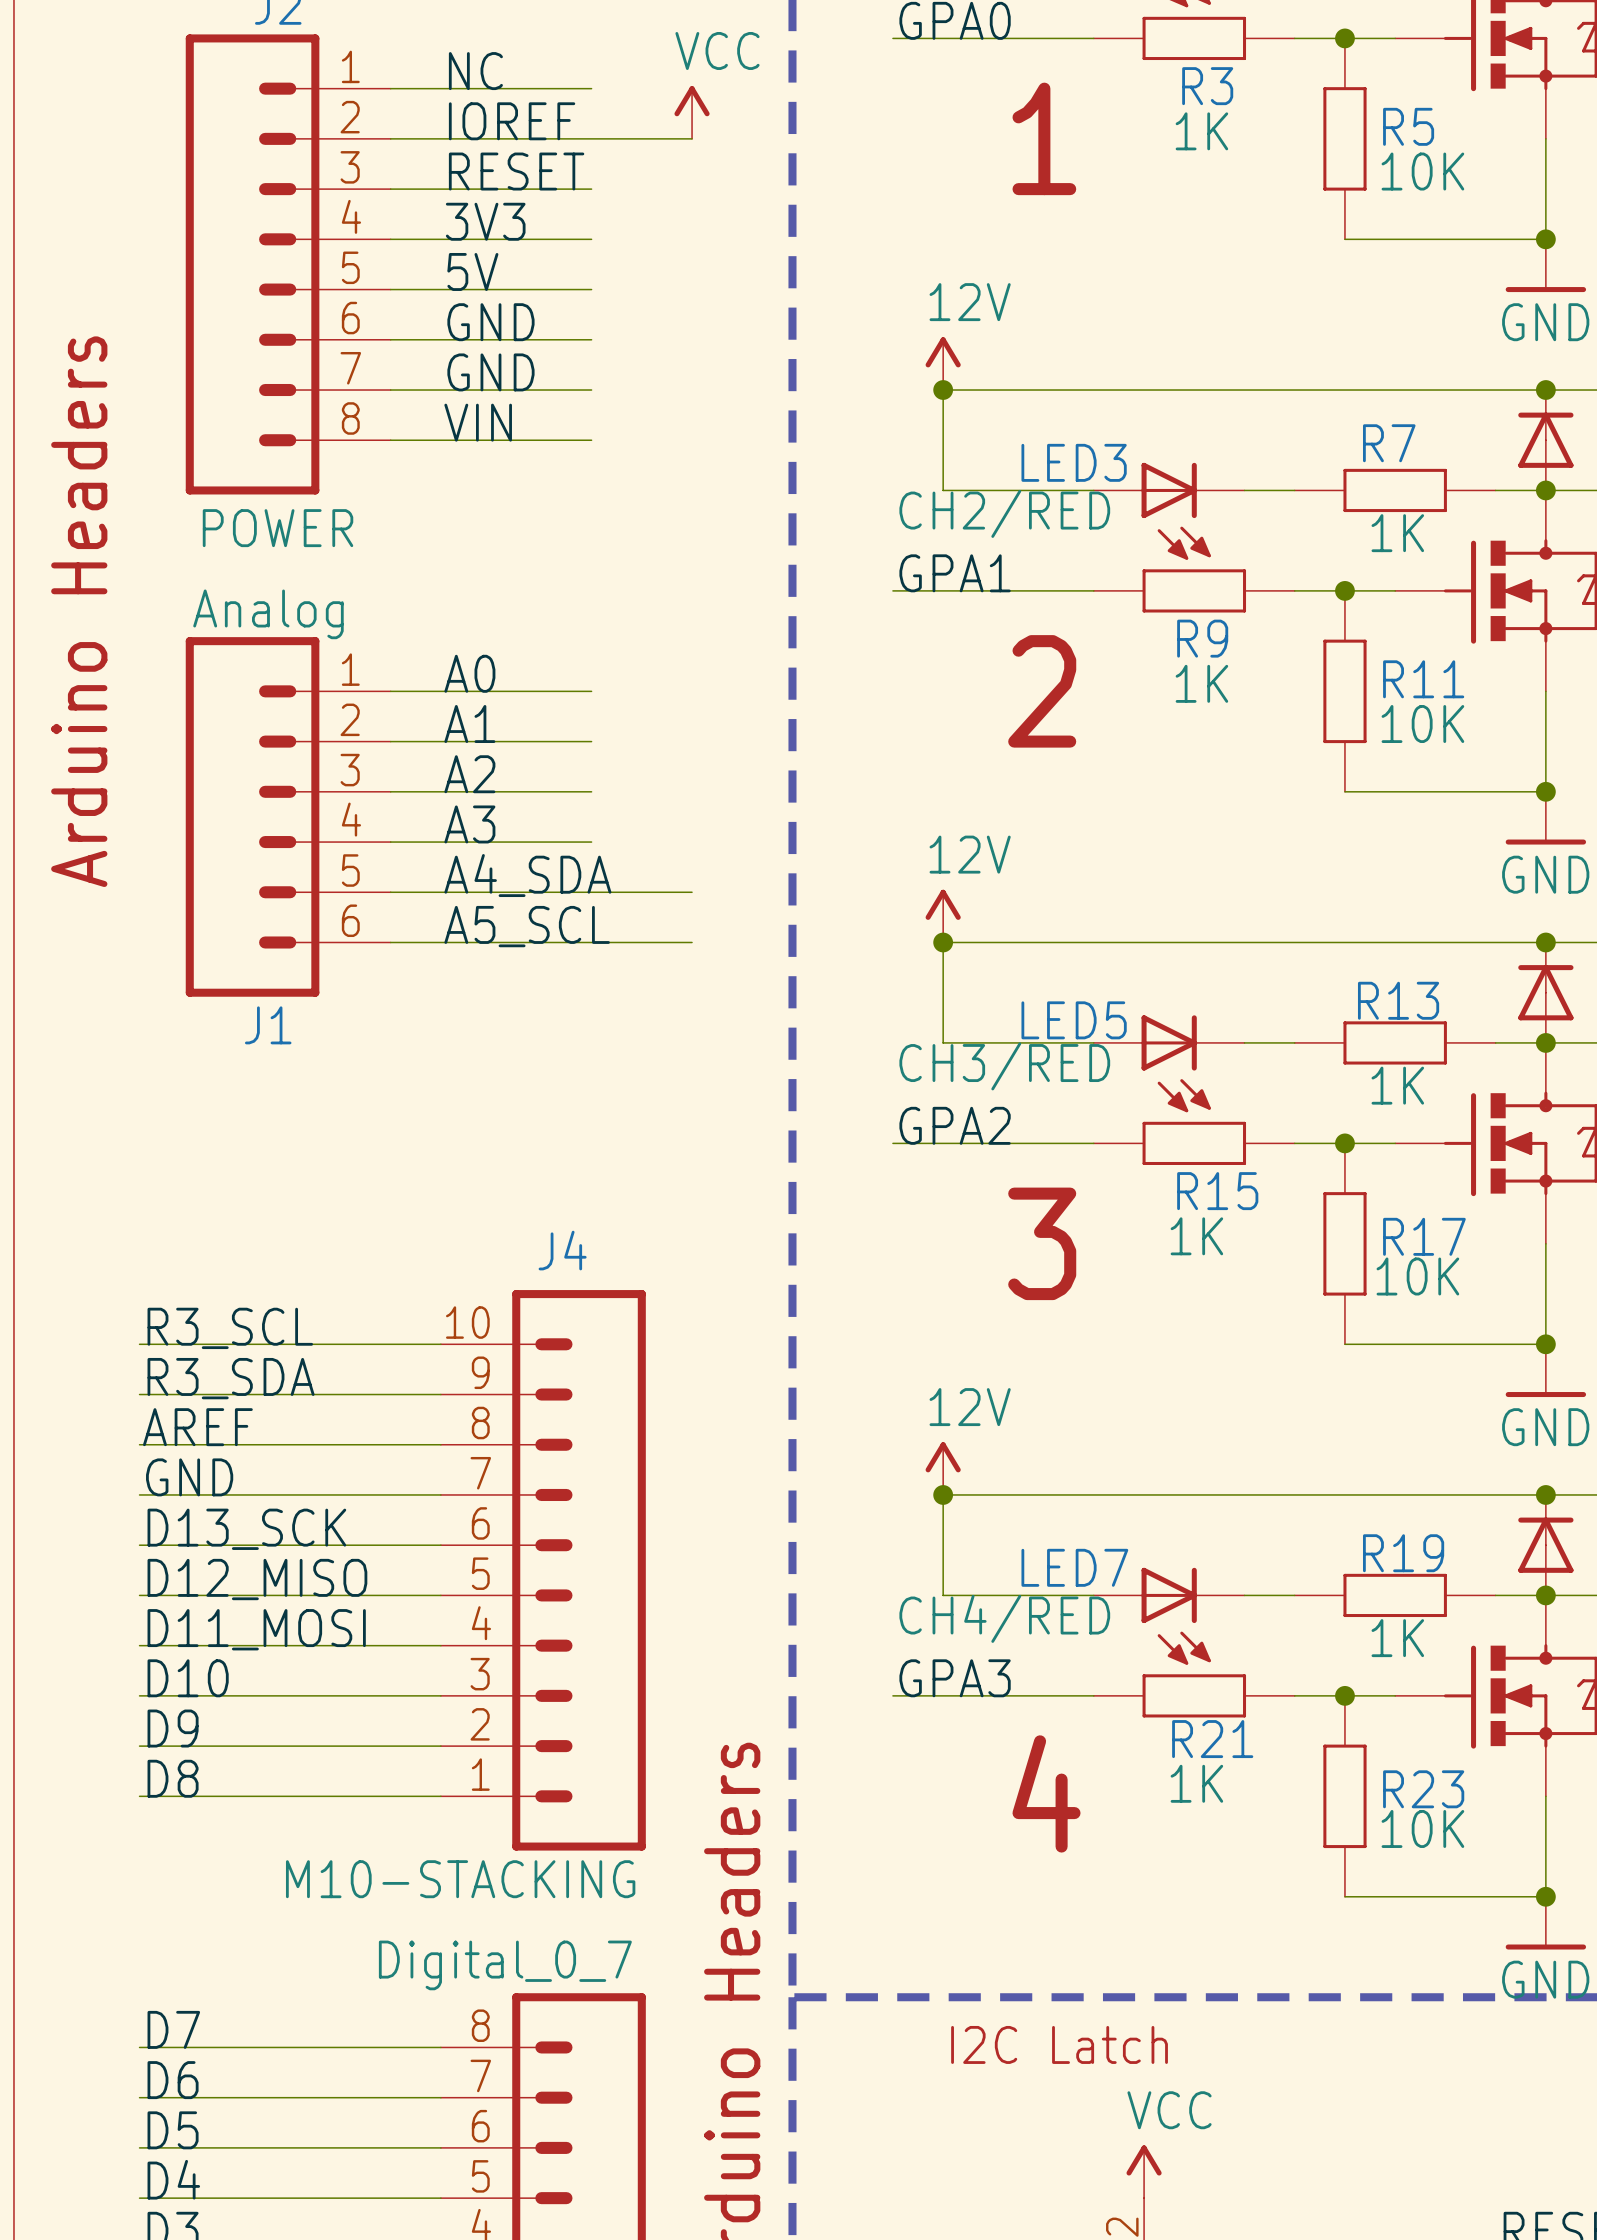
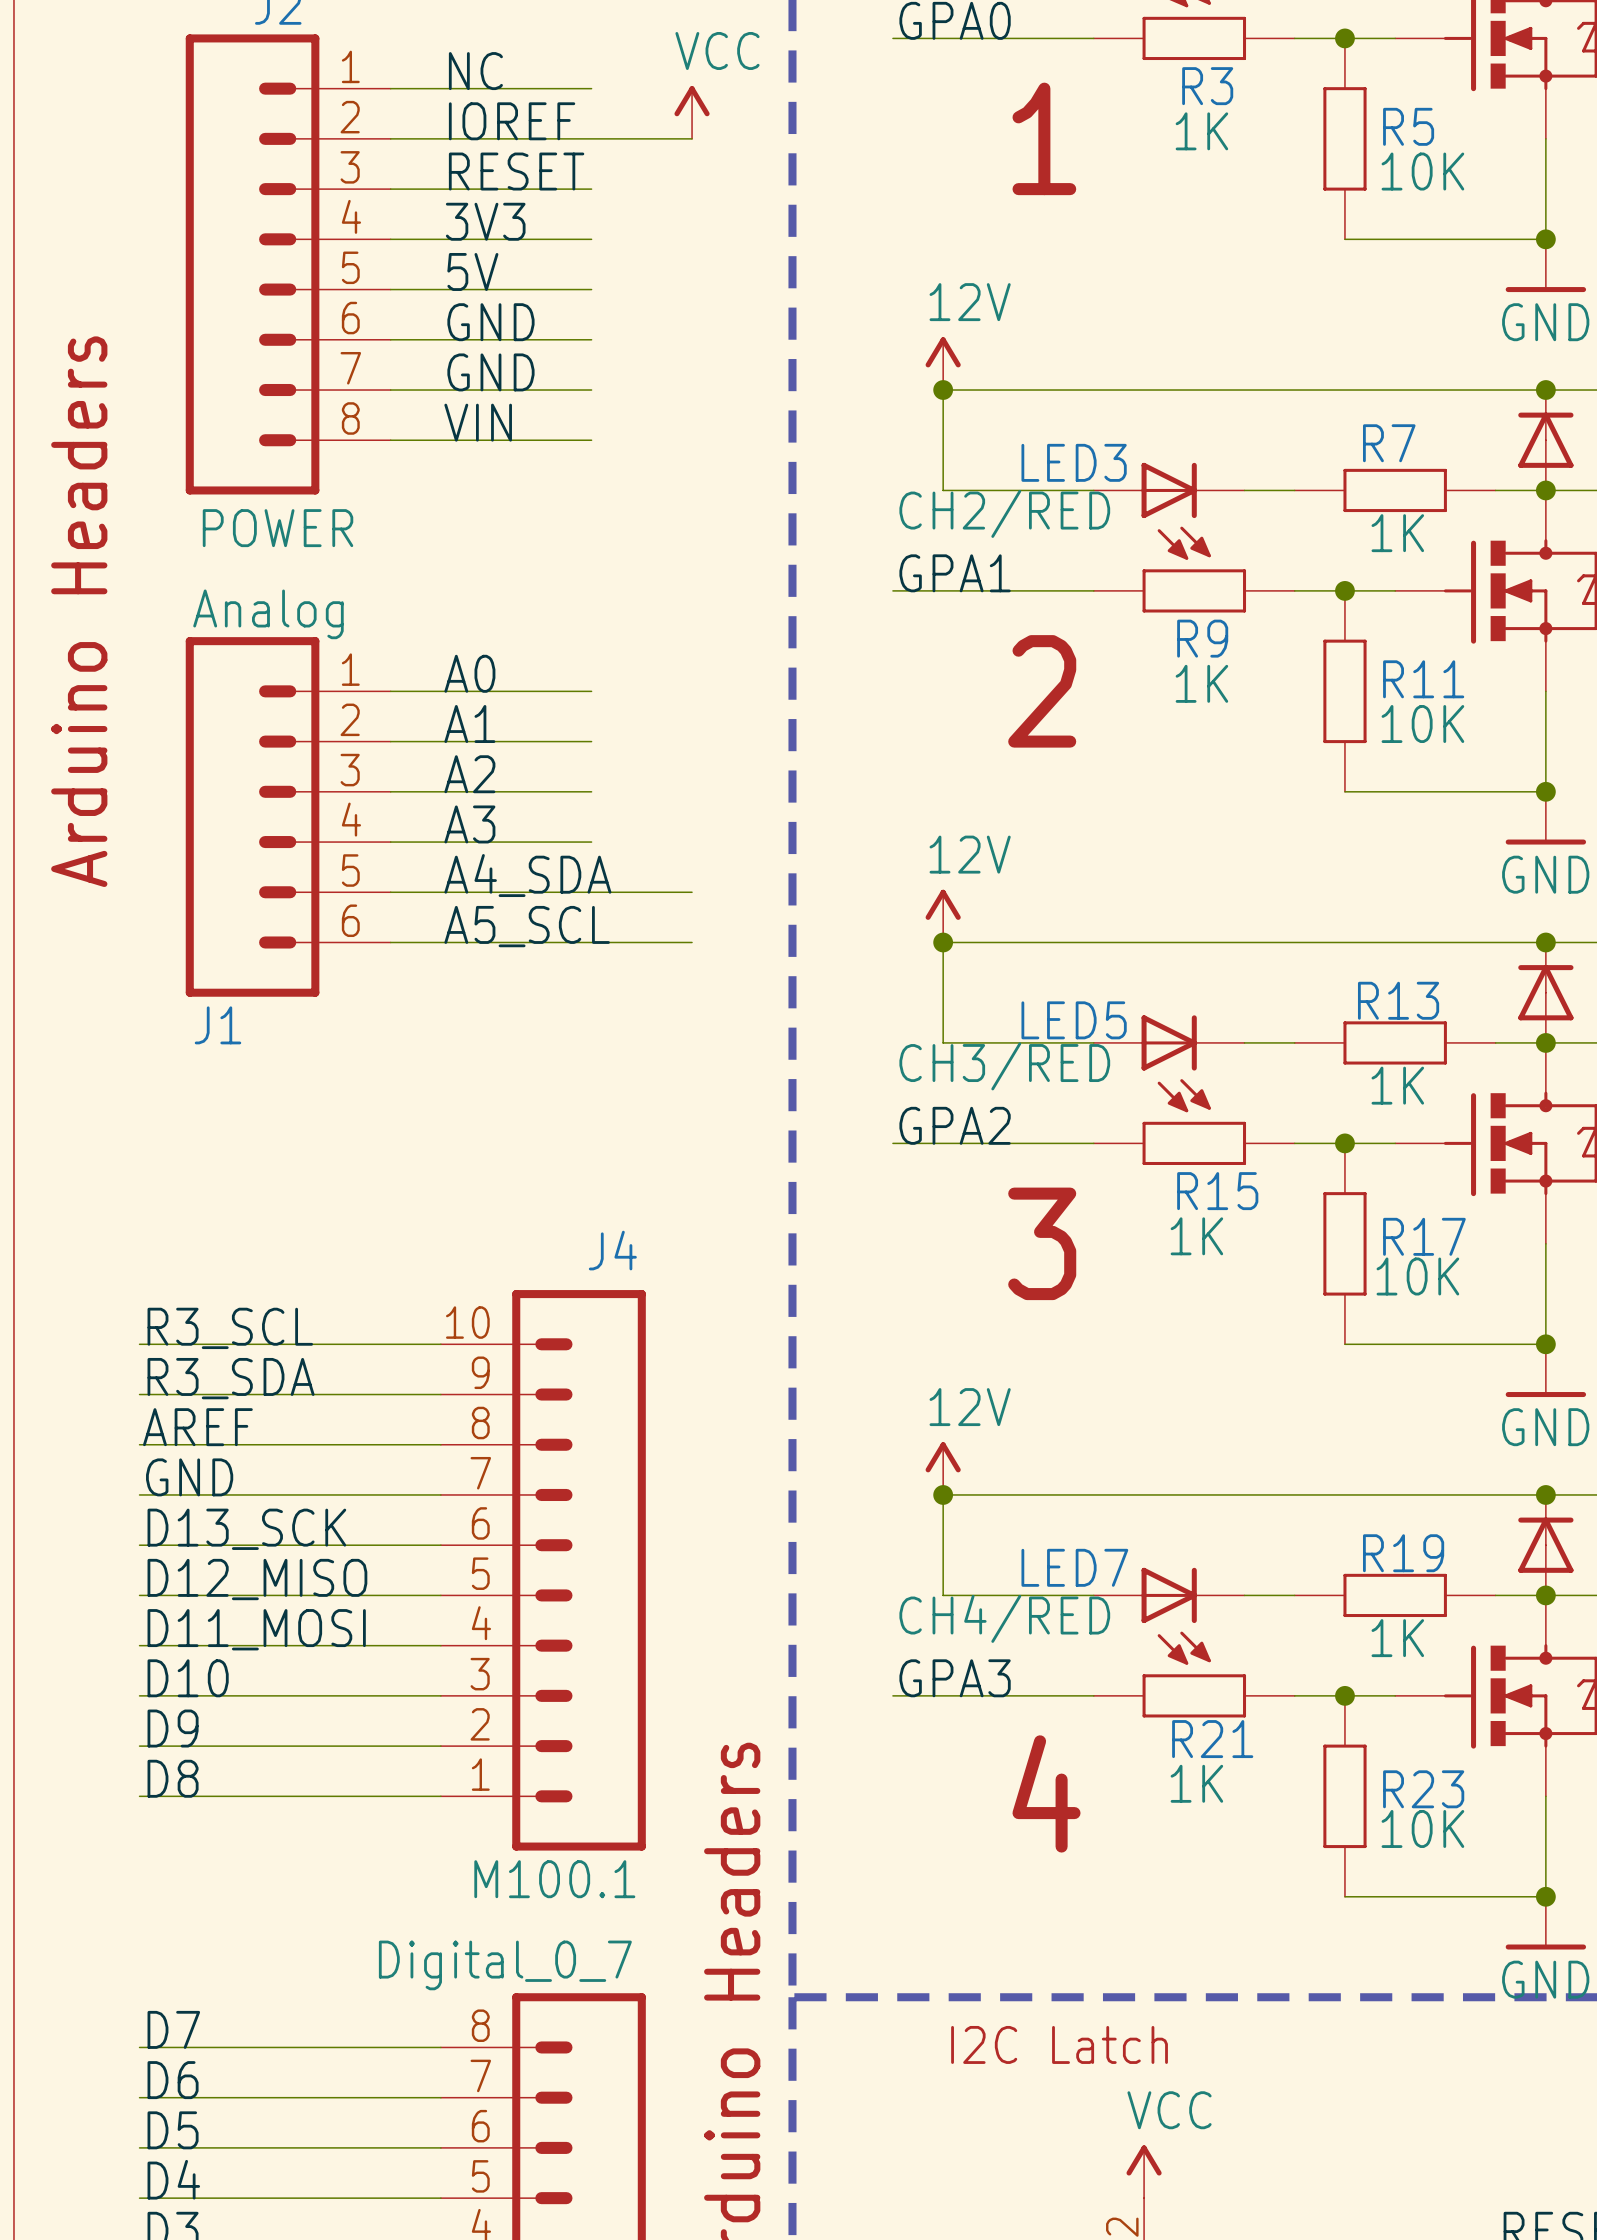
J1 name position: J1 (268, 1025) -> J1 (217, 1025)
J4 name position: J4 (562, 1250) -> J4 (612, 1250)
J4 value: M10-STACKING (460, 1879) -> M100.1 (554, 1879)

